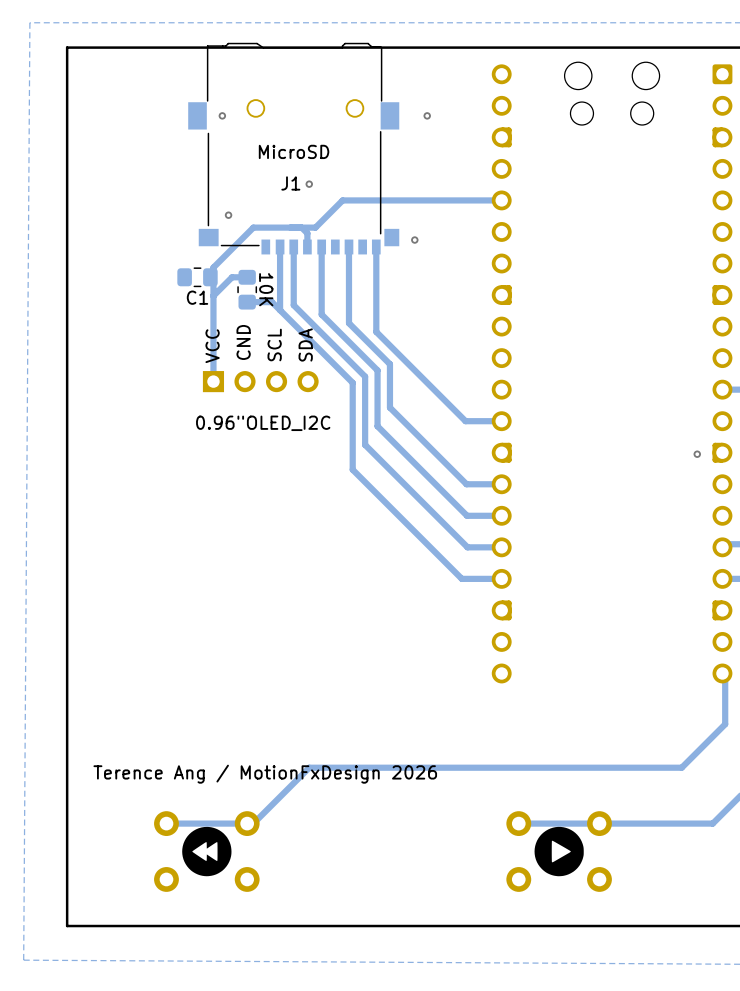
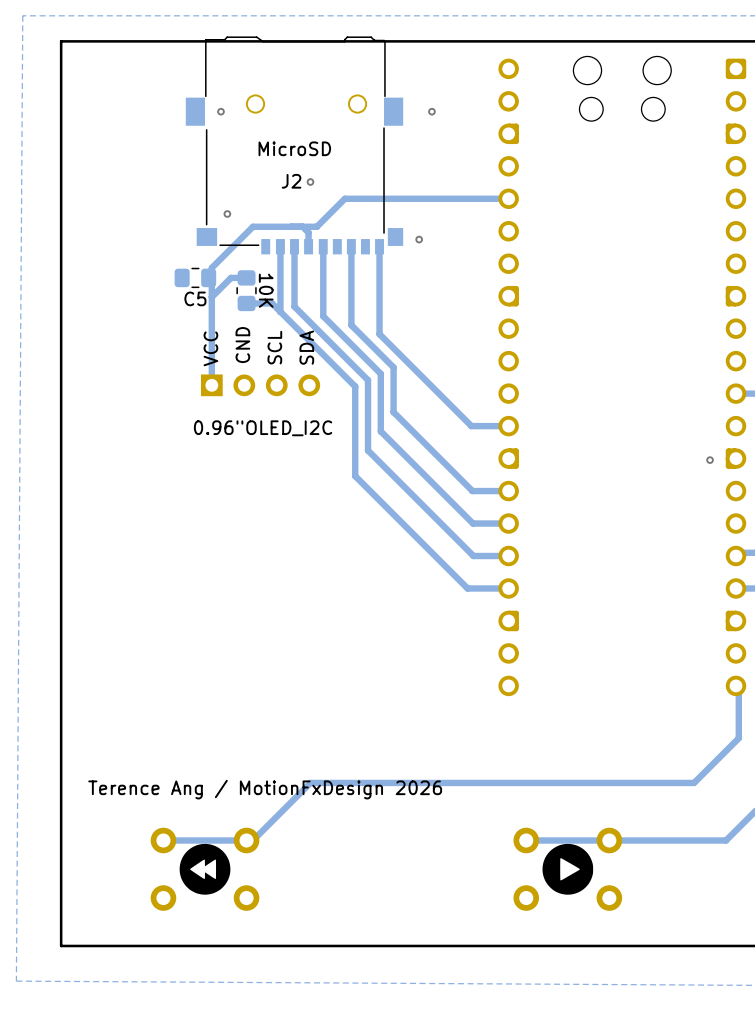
J1 name: J1 (290, 183) -> J2 (291, 181)
C1 name: C1 (197, 297) -> C5 (195, 298)

